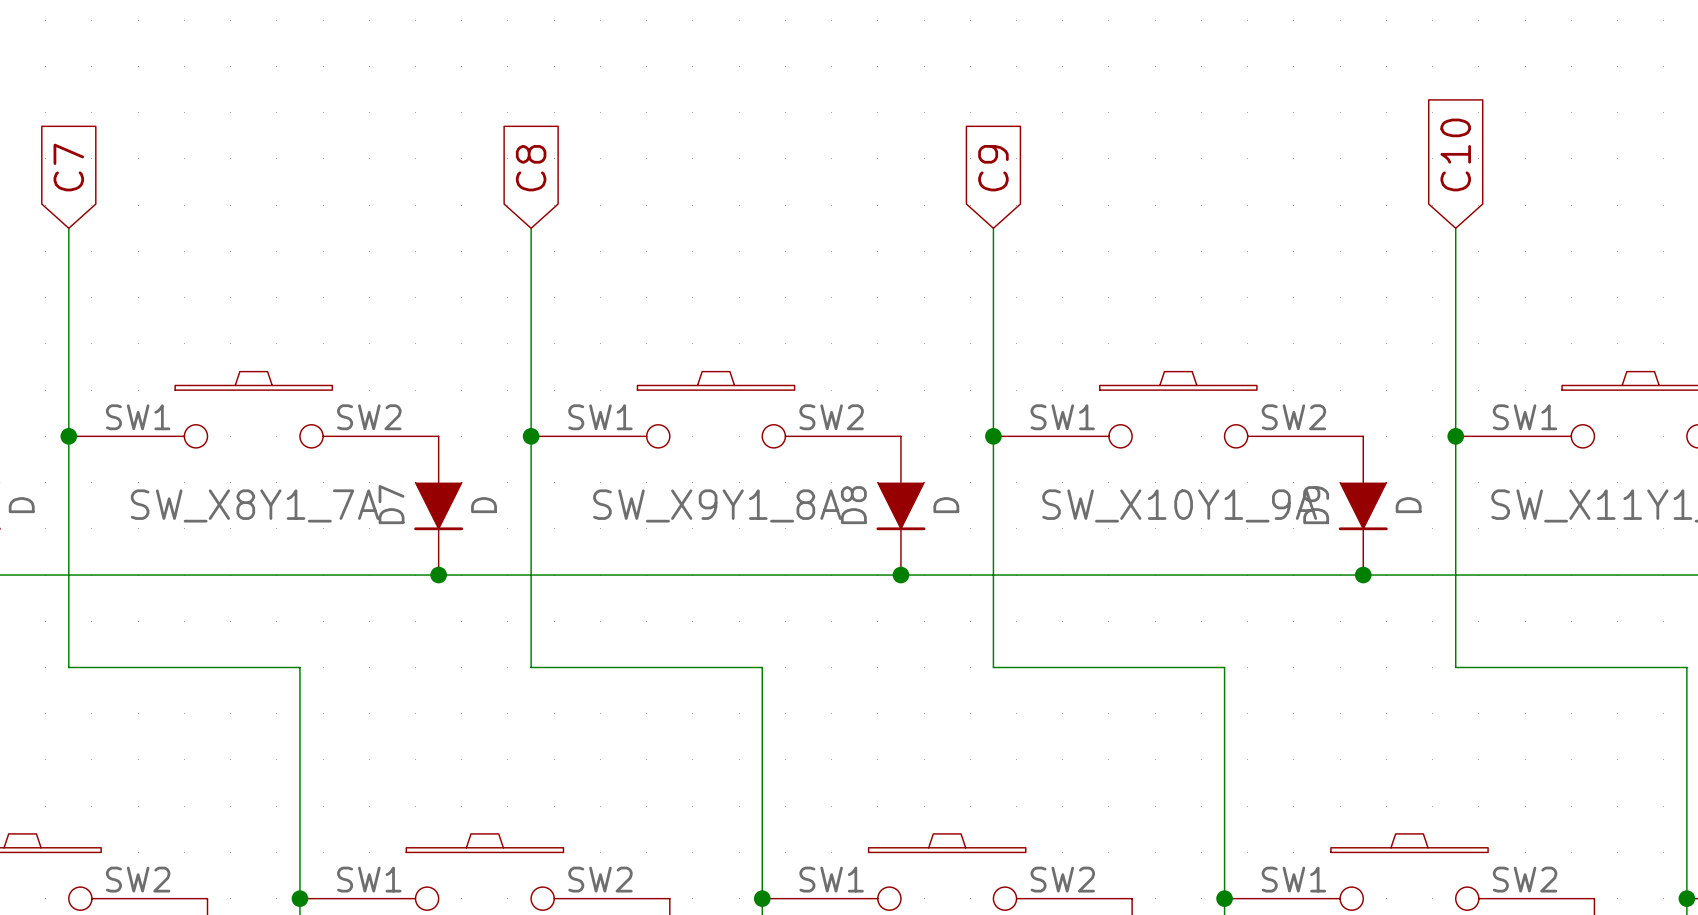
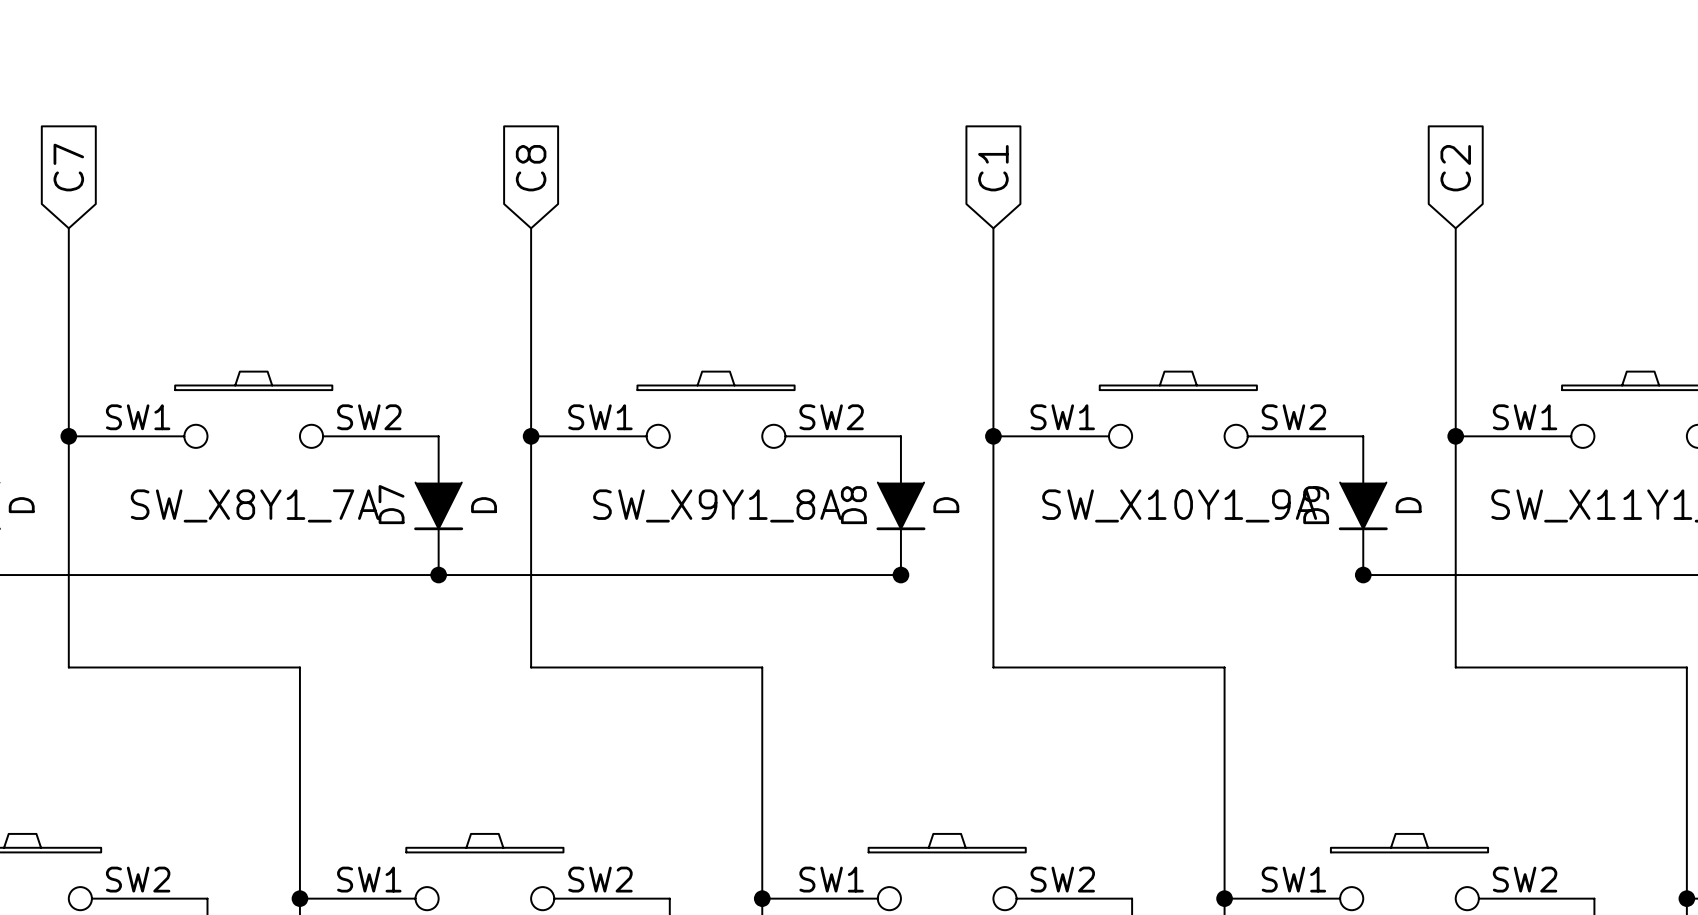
global label: C10 (1455, 154) -> C2 (1455, 168)
global label: C9 (993, 168) -> C1 (993, 168)
wire: (900, 575) (1363, 575) -> none

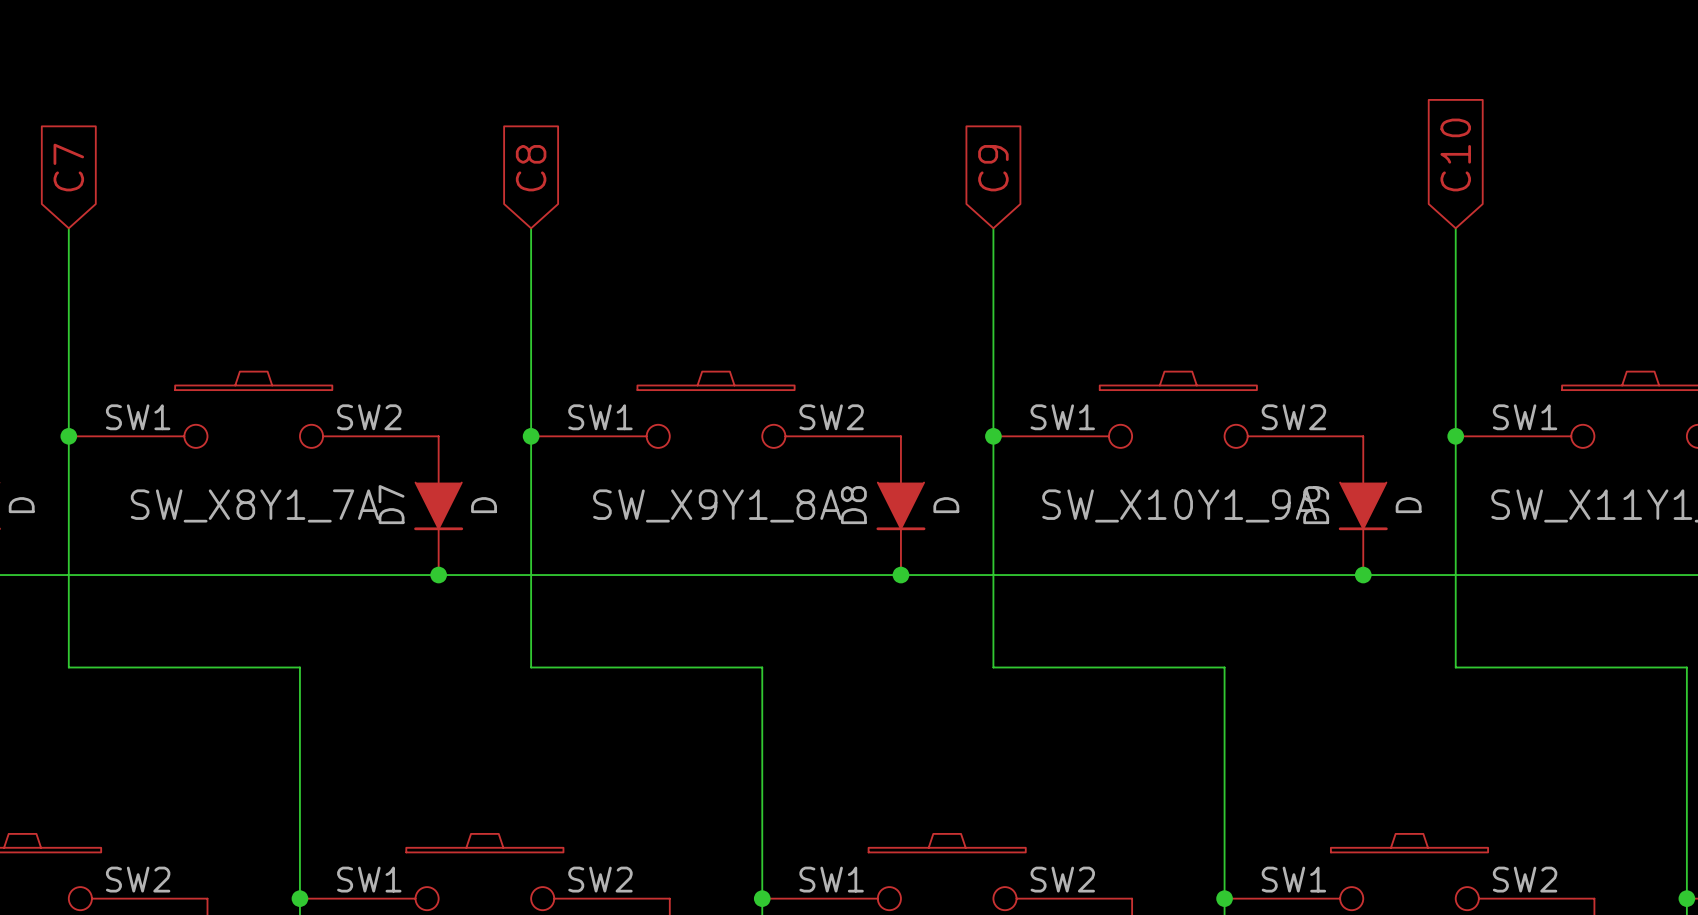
global label: C1 (993, 168) -> C9 (993, 168)
global label: C2 (1455, 168) -> C10 (1455, 154)
wire: none -> (900, 575) (1363, 575)

